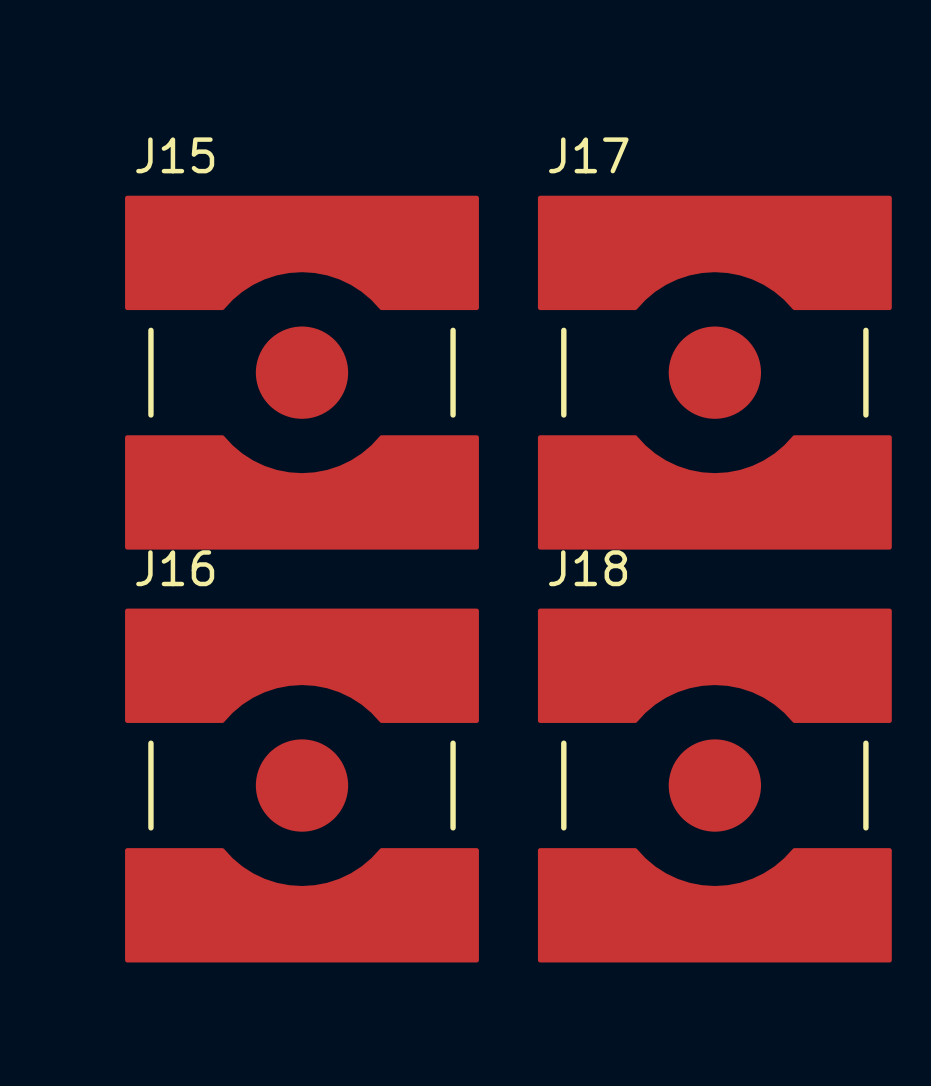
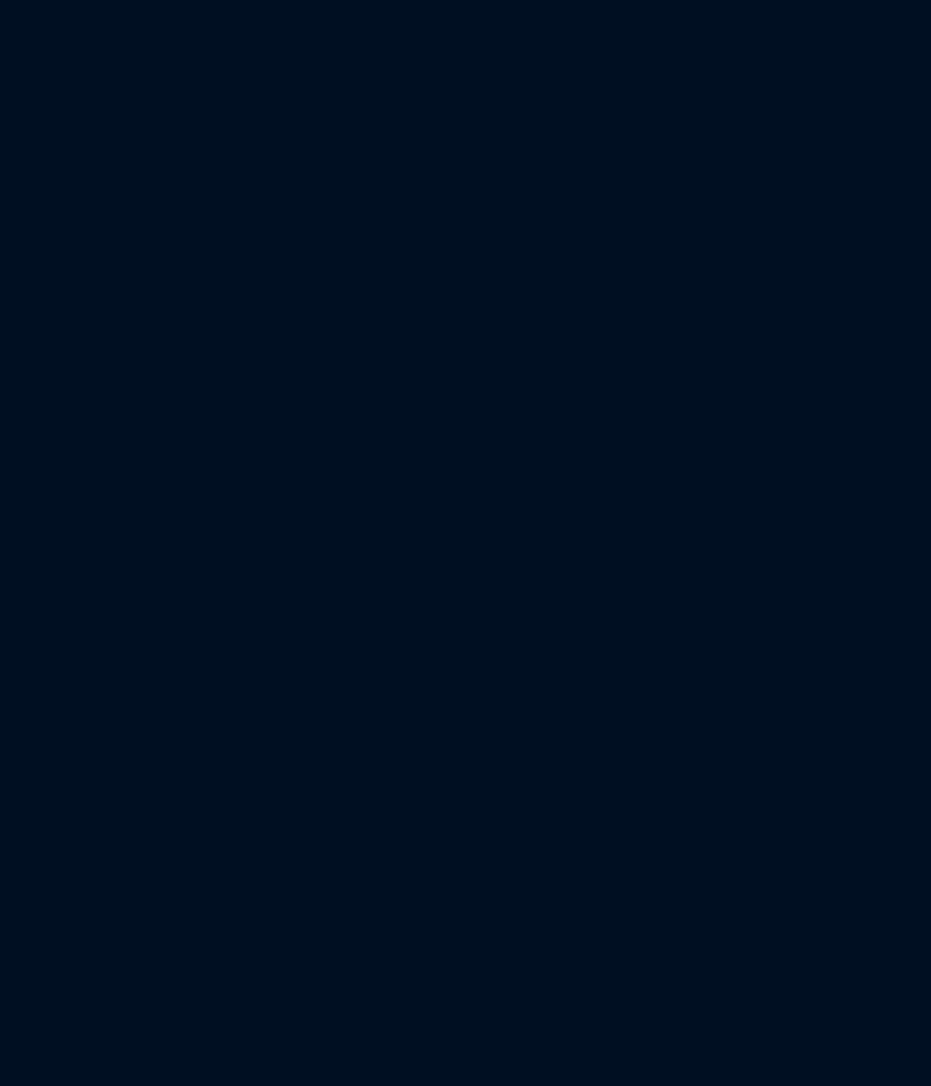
J15: (302, 372) -> none
J17: (714, 372) -> none
J16: (302, 785) -> none
J18: (714, 785) -> none

